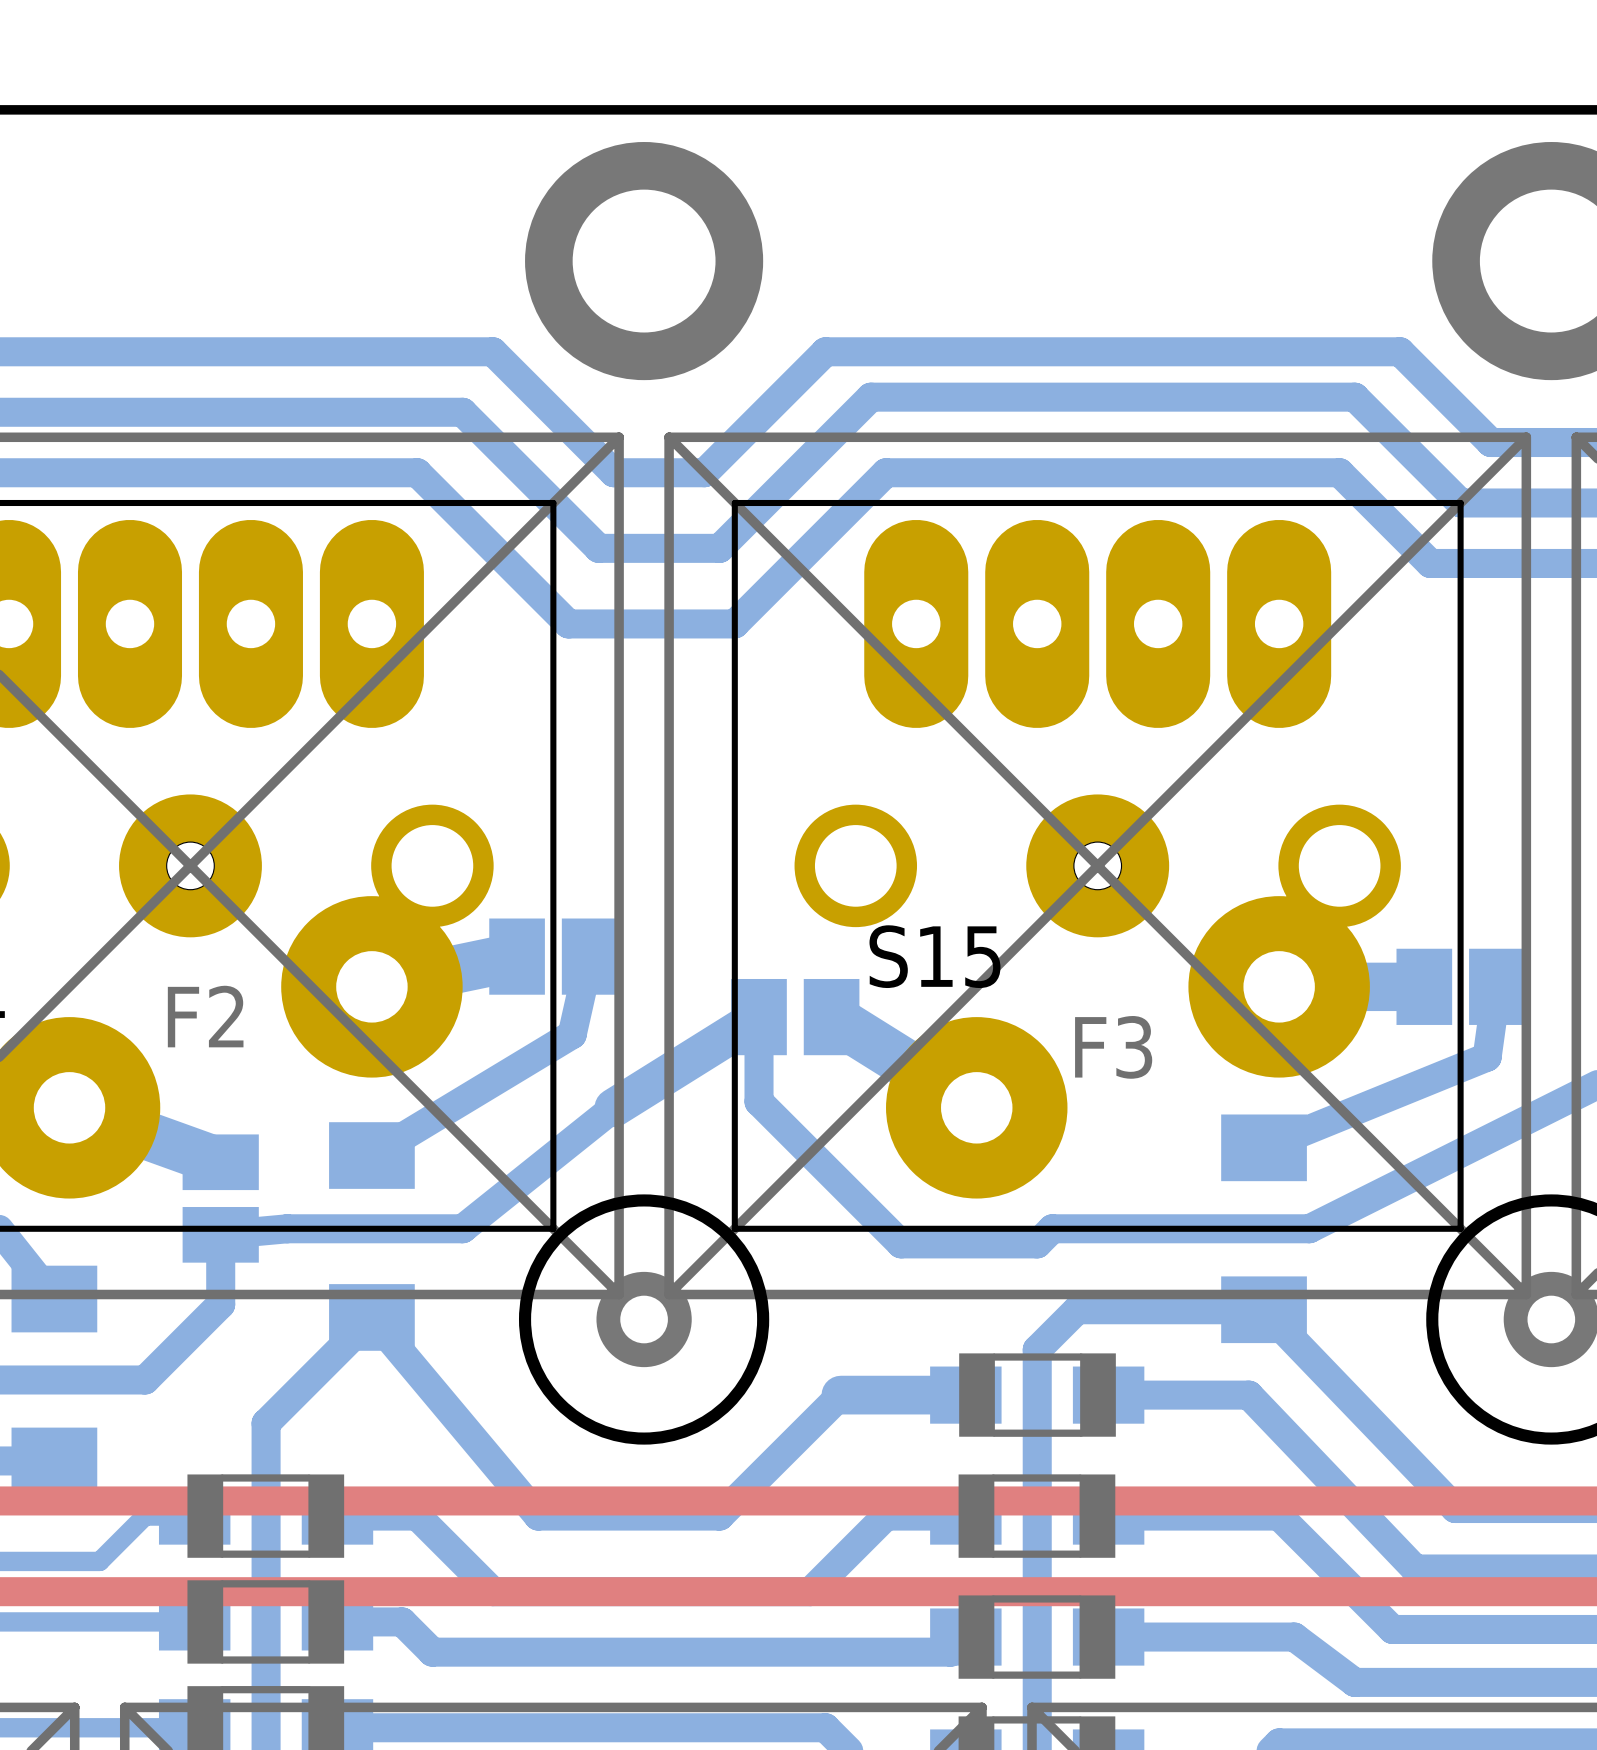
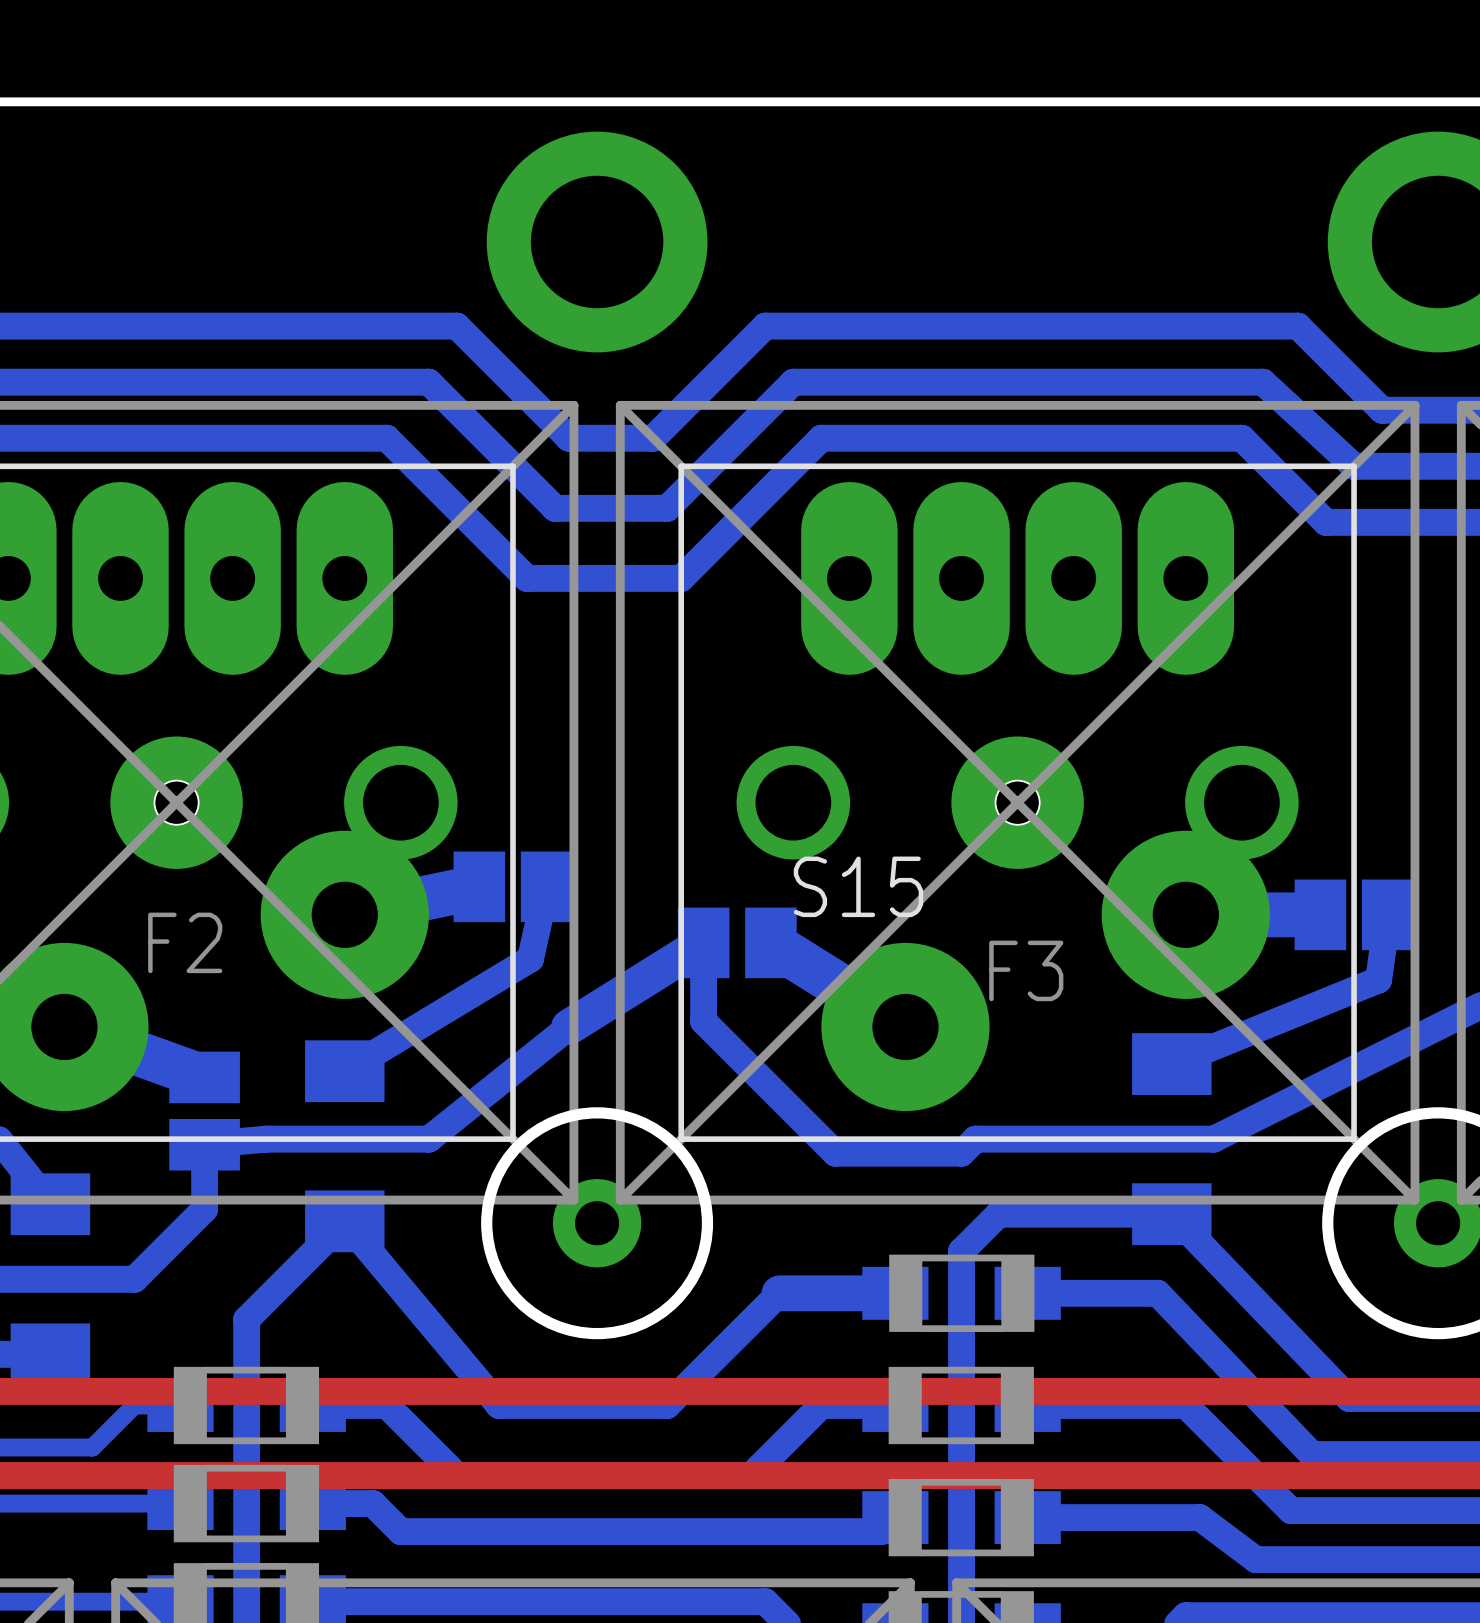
bottom track: (855, 412) (870, 397) (1354, 397) (1460, 502) -> (793, 382) (1262, 382) (1354, 466)

